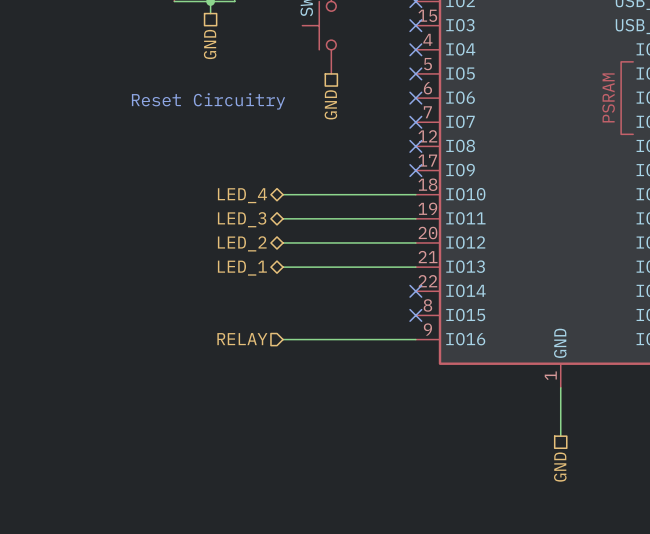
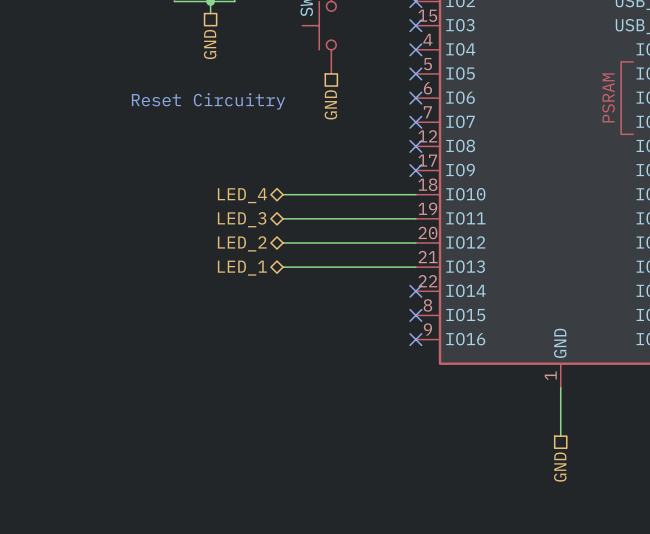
hierarchical label: RELAY (242, 339) -> none
wire: (283, 339) (415, 339) -> none
no-connect mark: none -> (415, 339)

